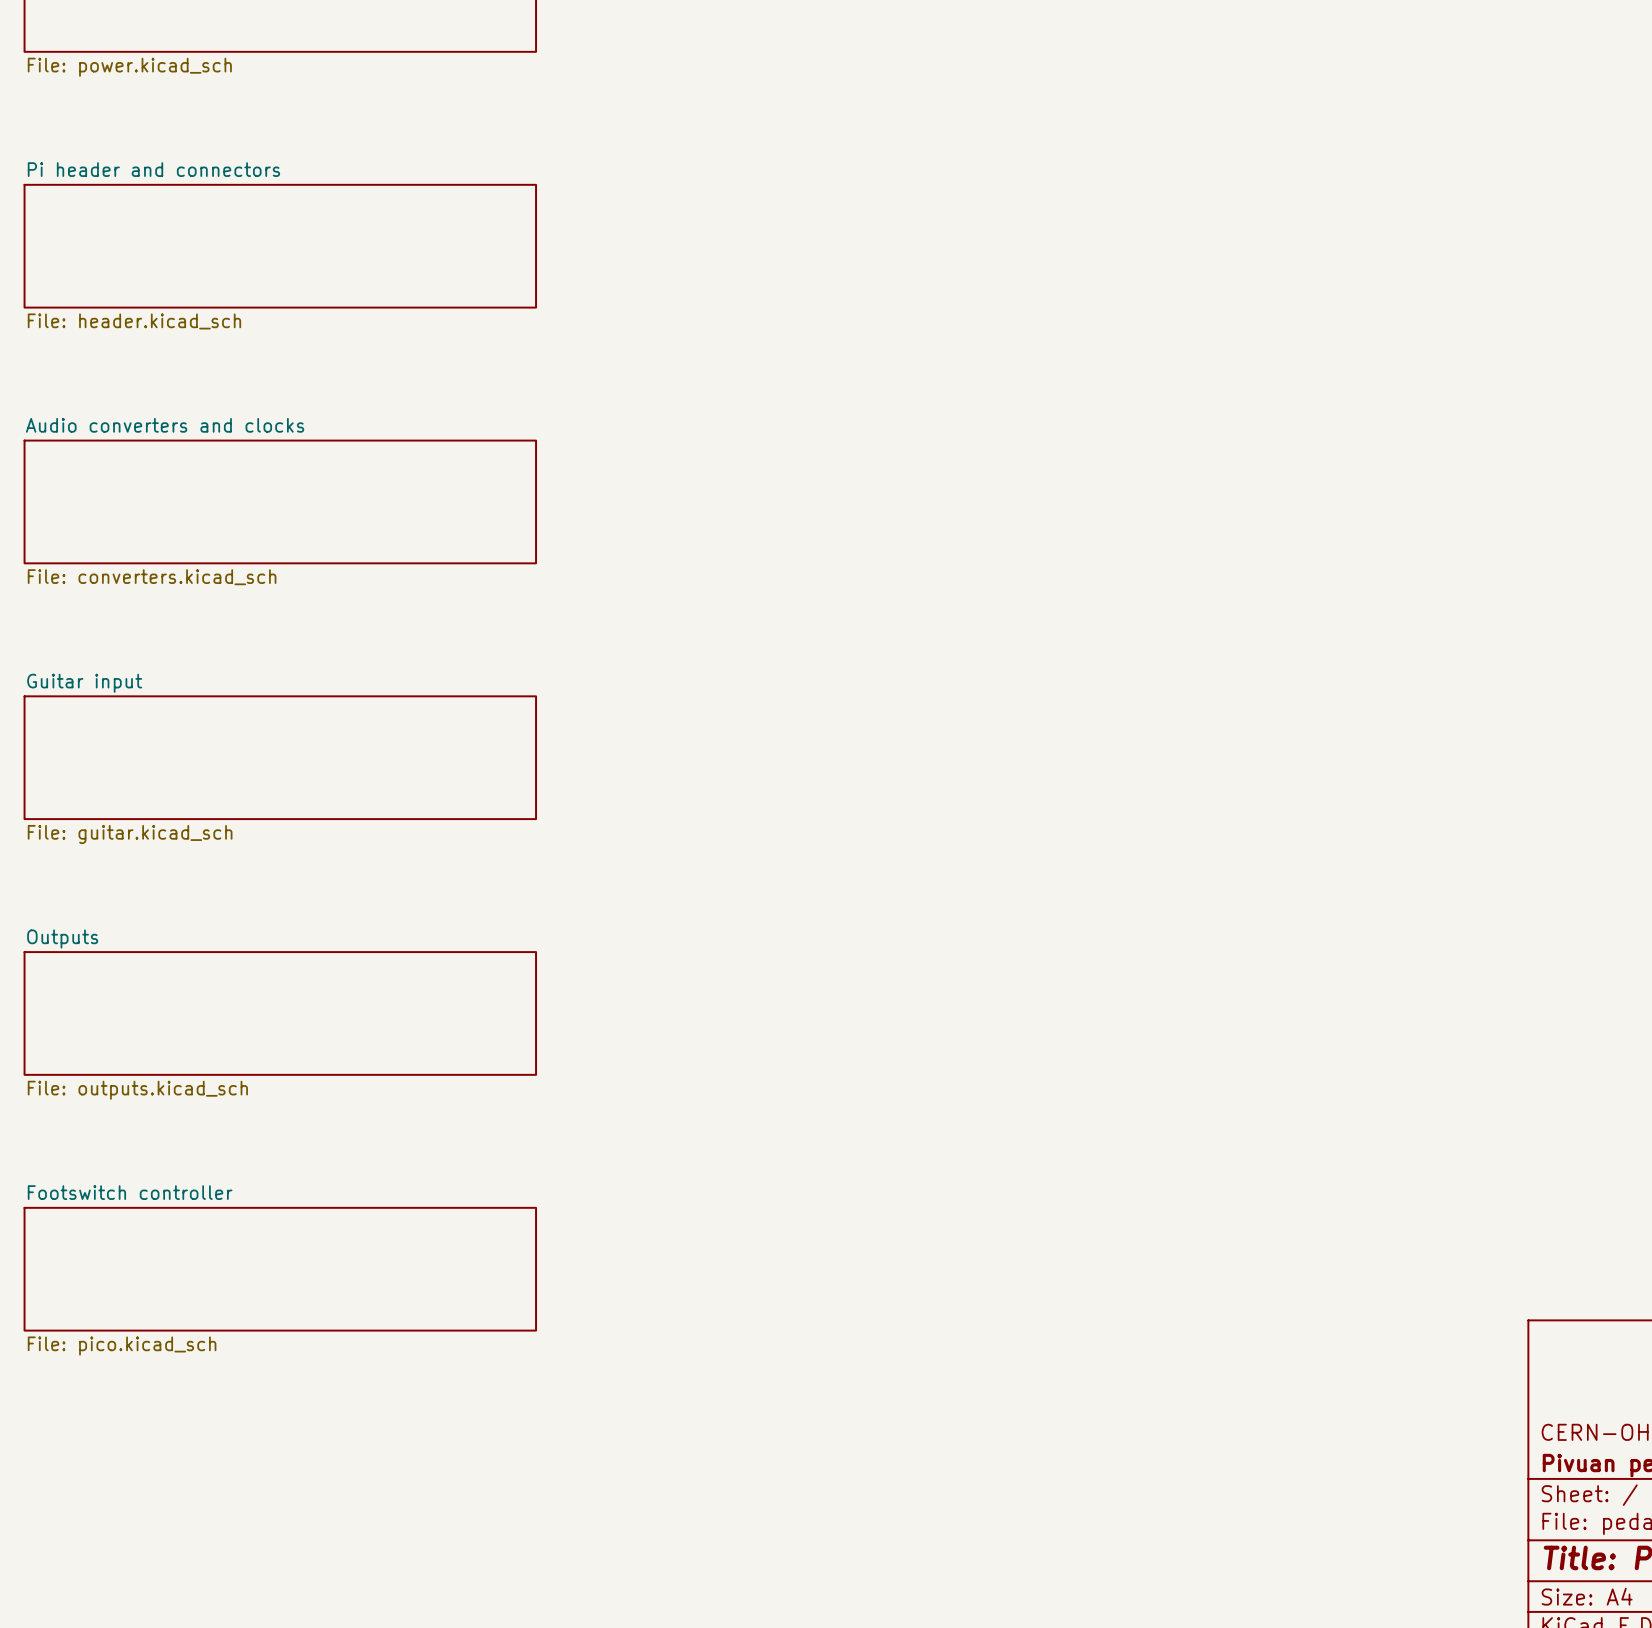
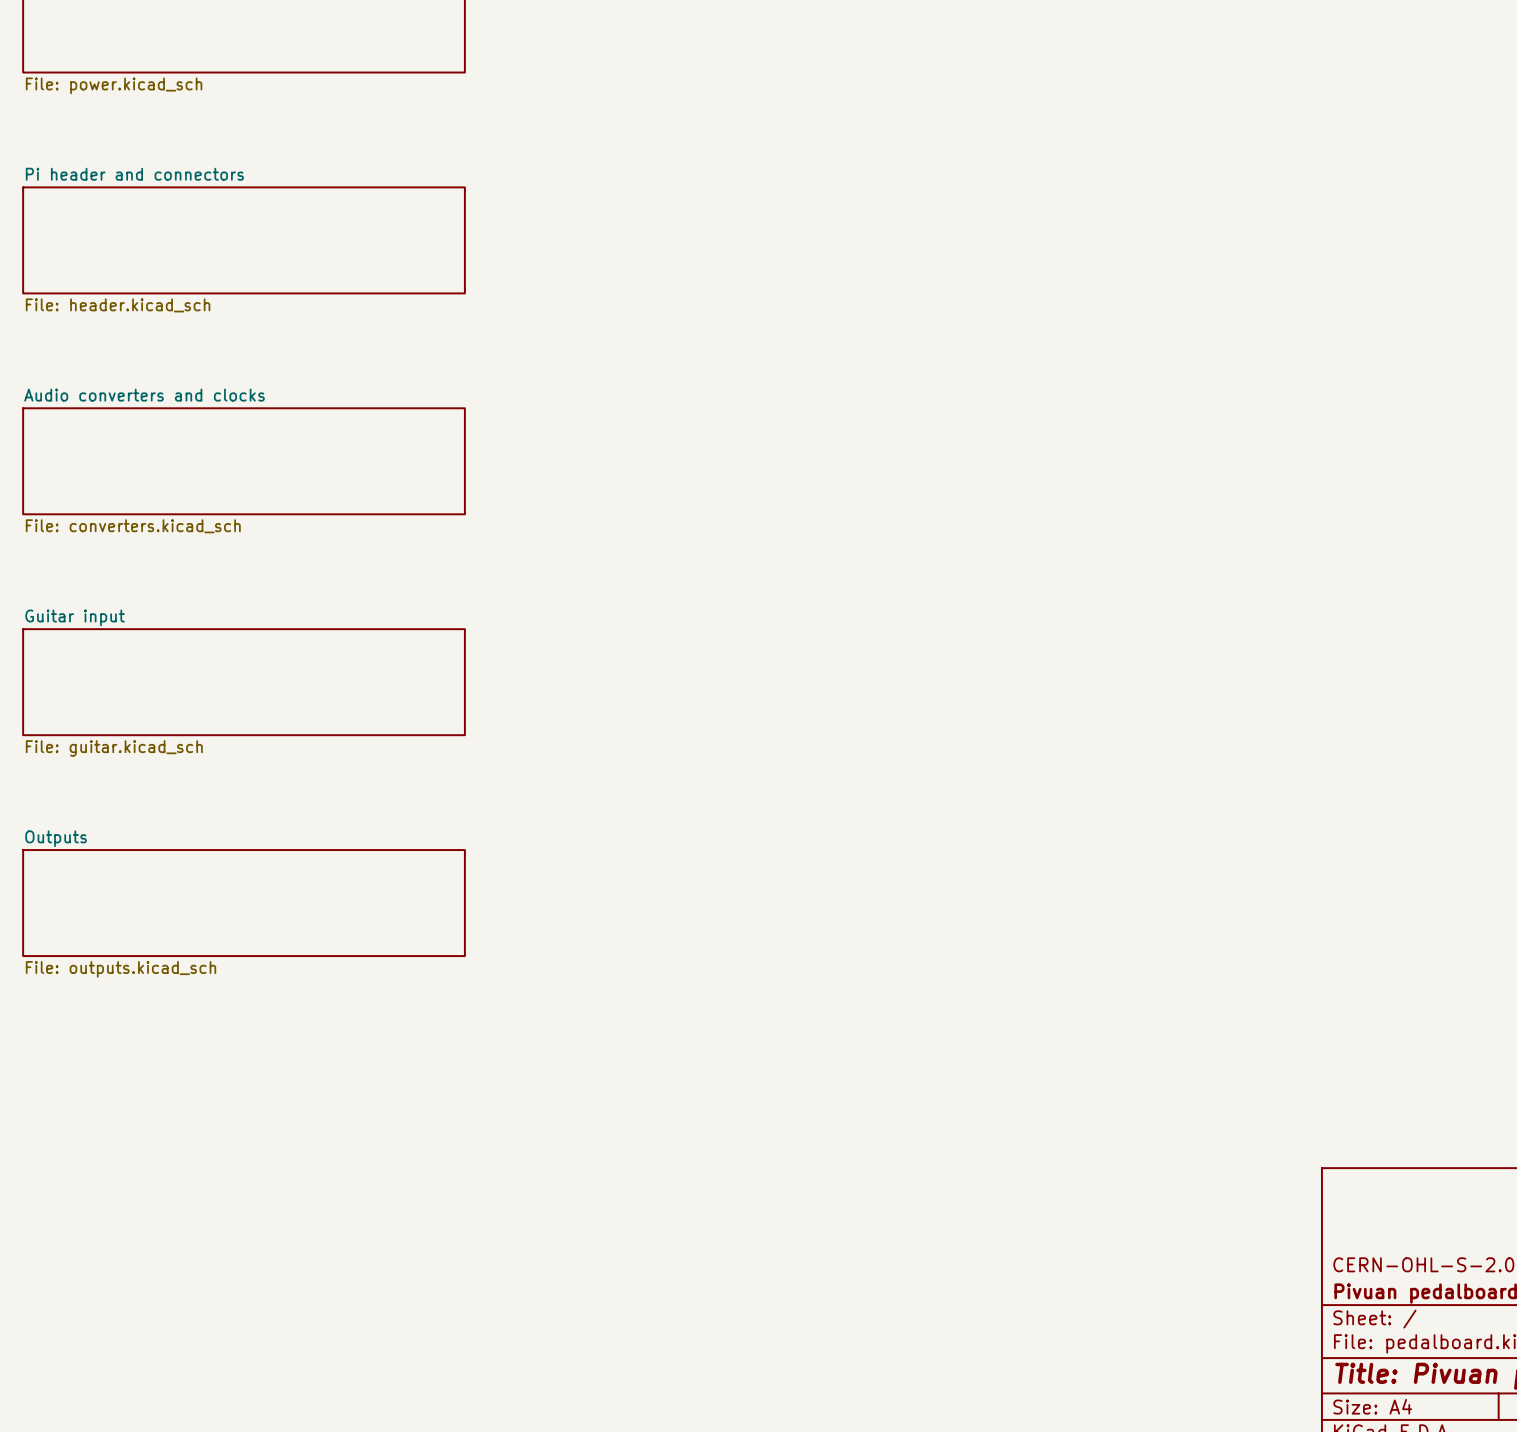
sheet Footswitch controller: File: pico.kicad_sch (280, 1269) -> none

